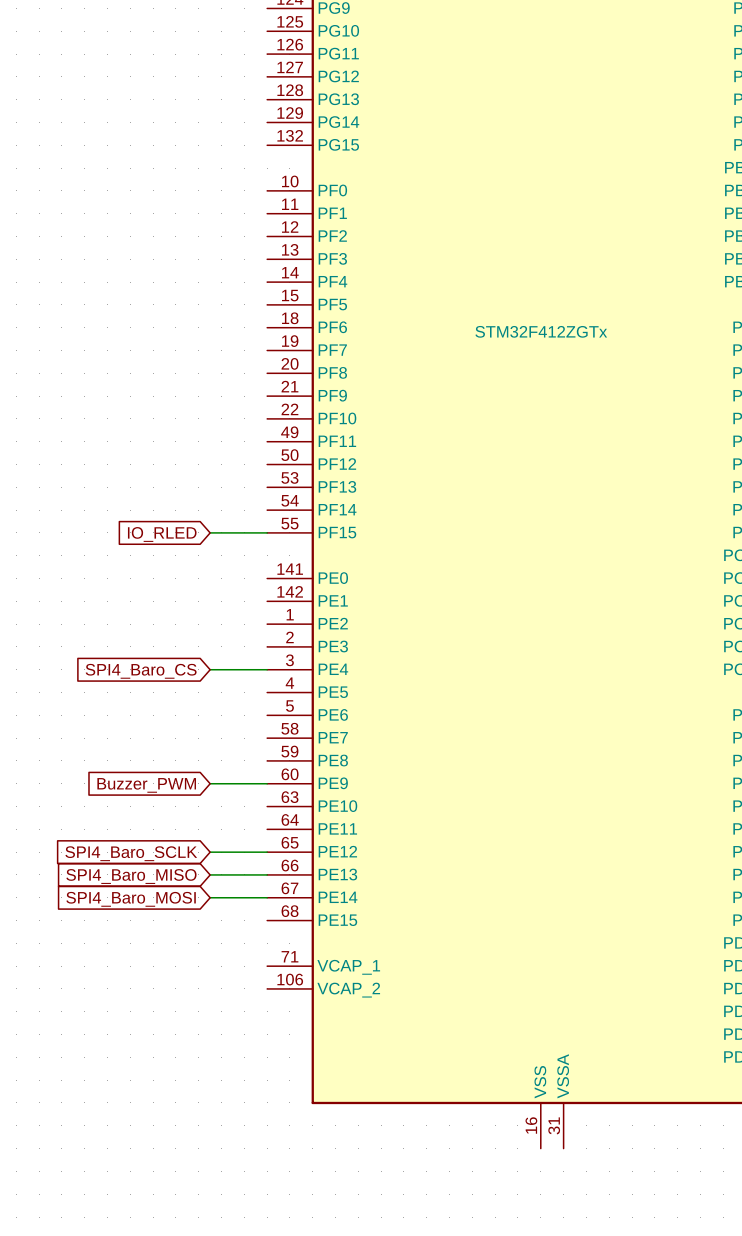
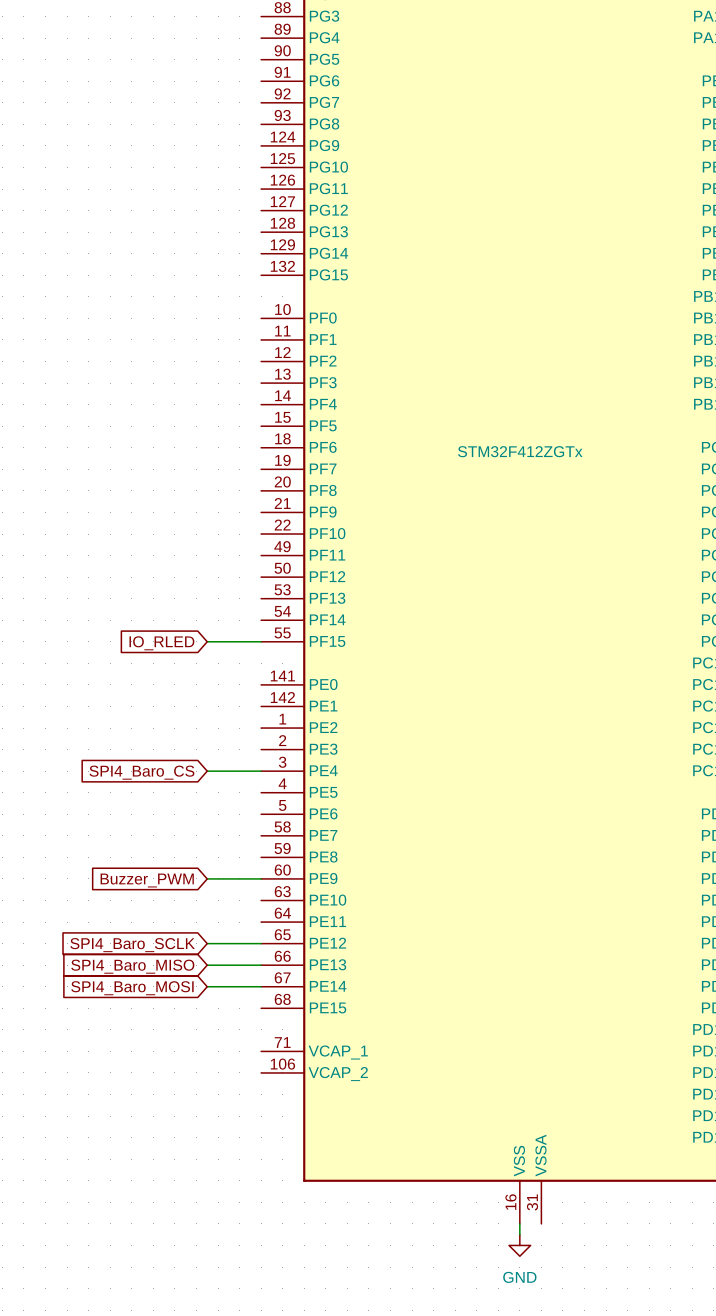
wire: none -> (519, 1223) (519, 1234)
power symbol: none -> GND (519, 1245)

